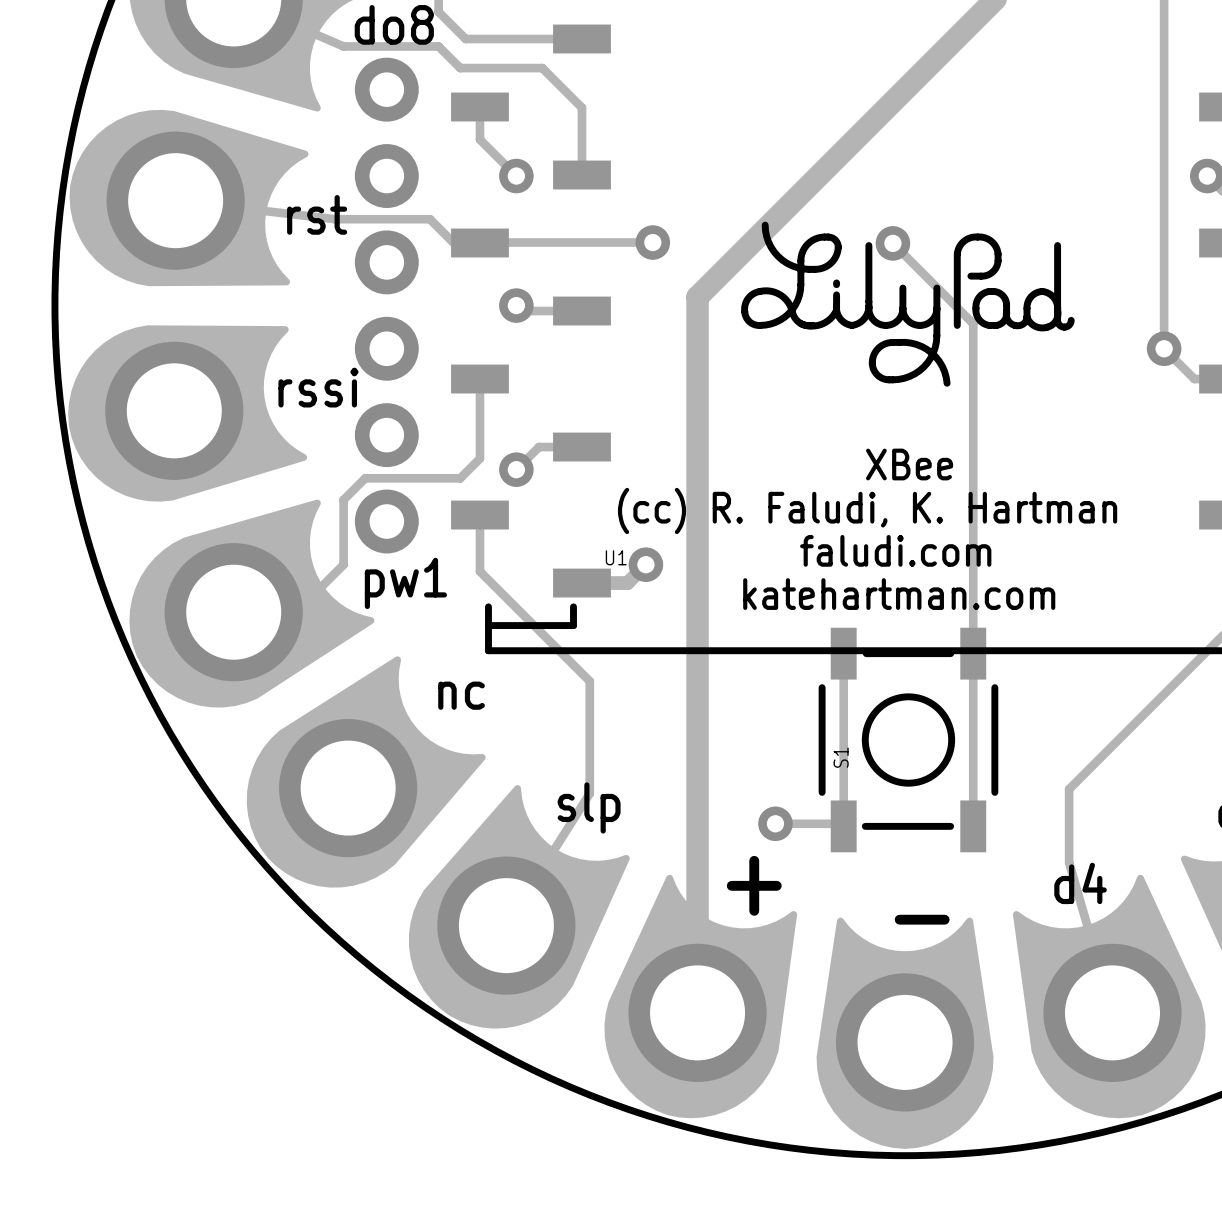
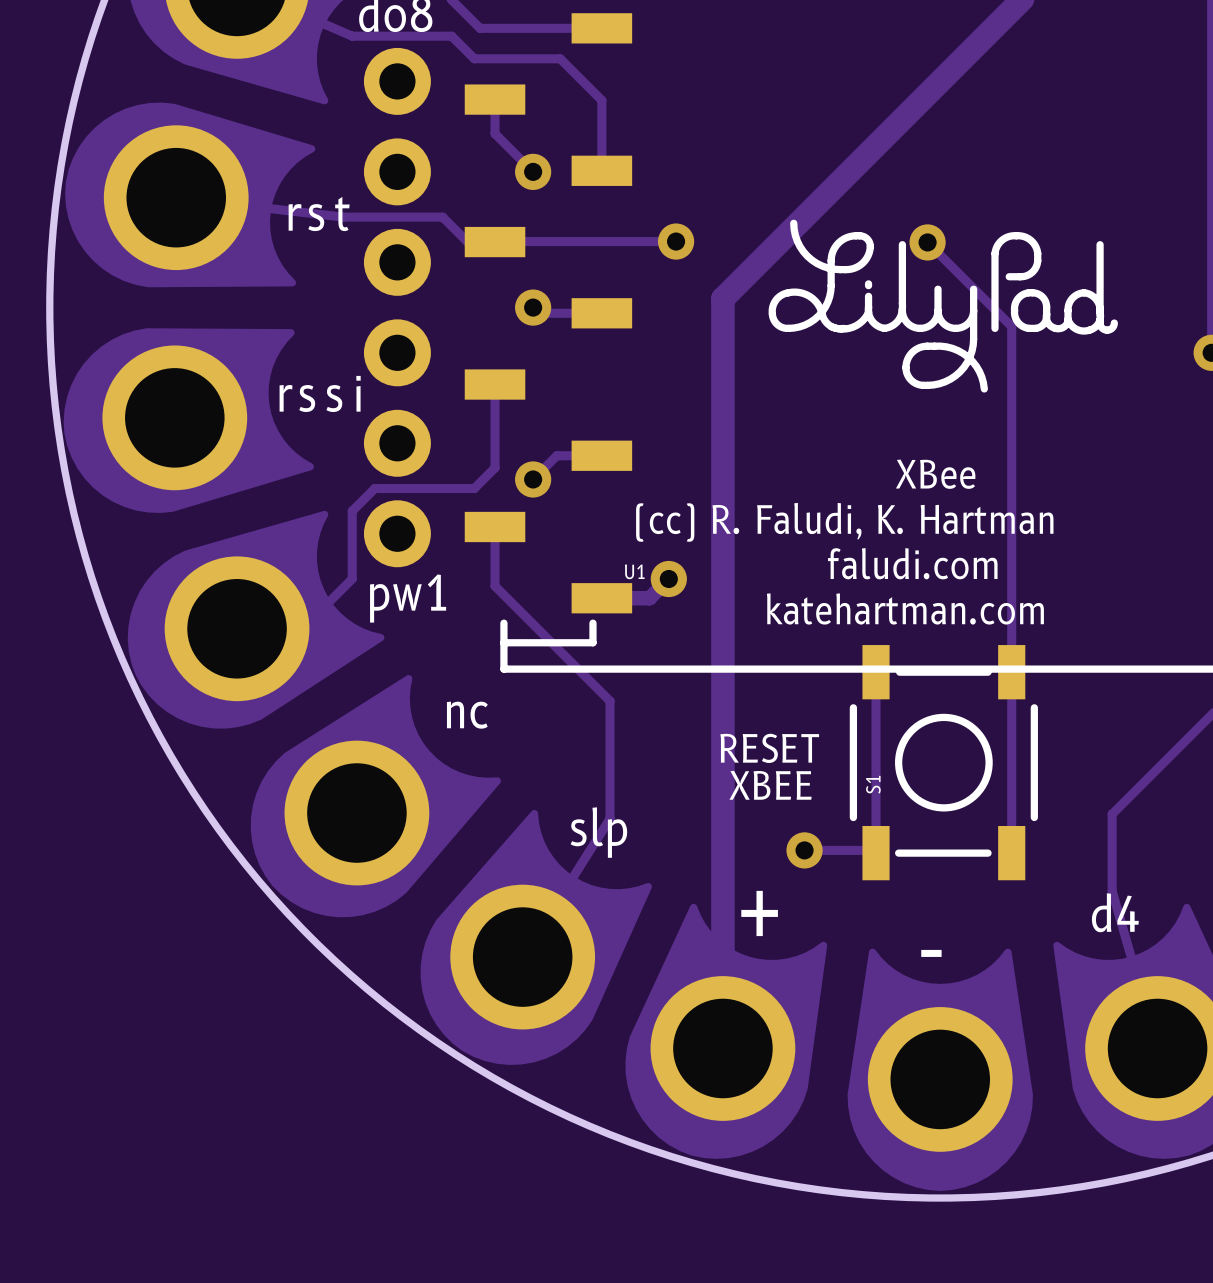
text: none -> RESET (769, 748)
text: none -> XBEE (770, 785)

